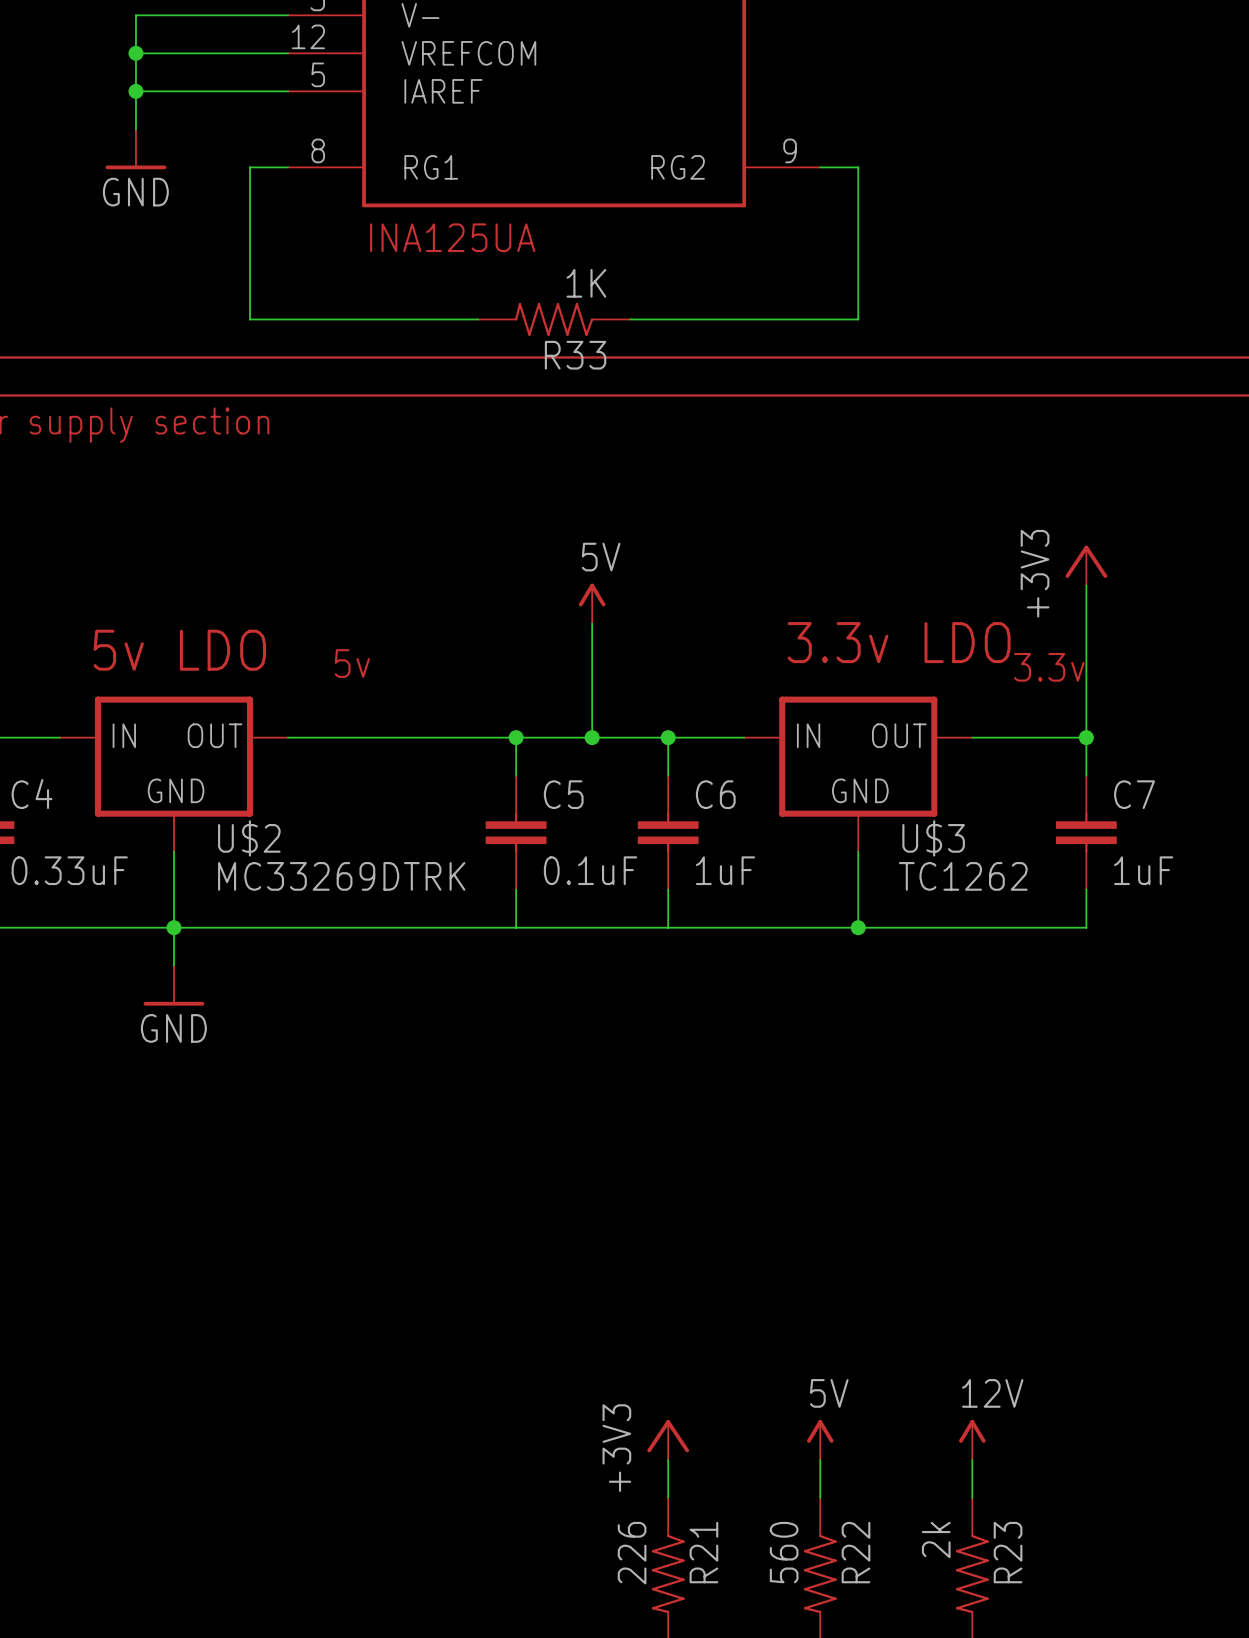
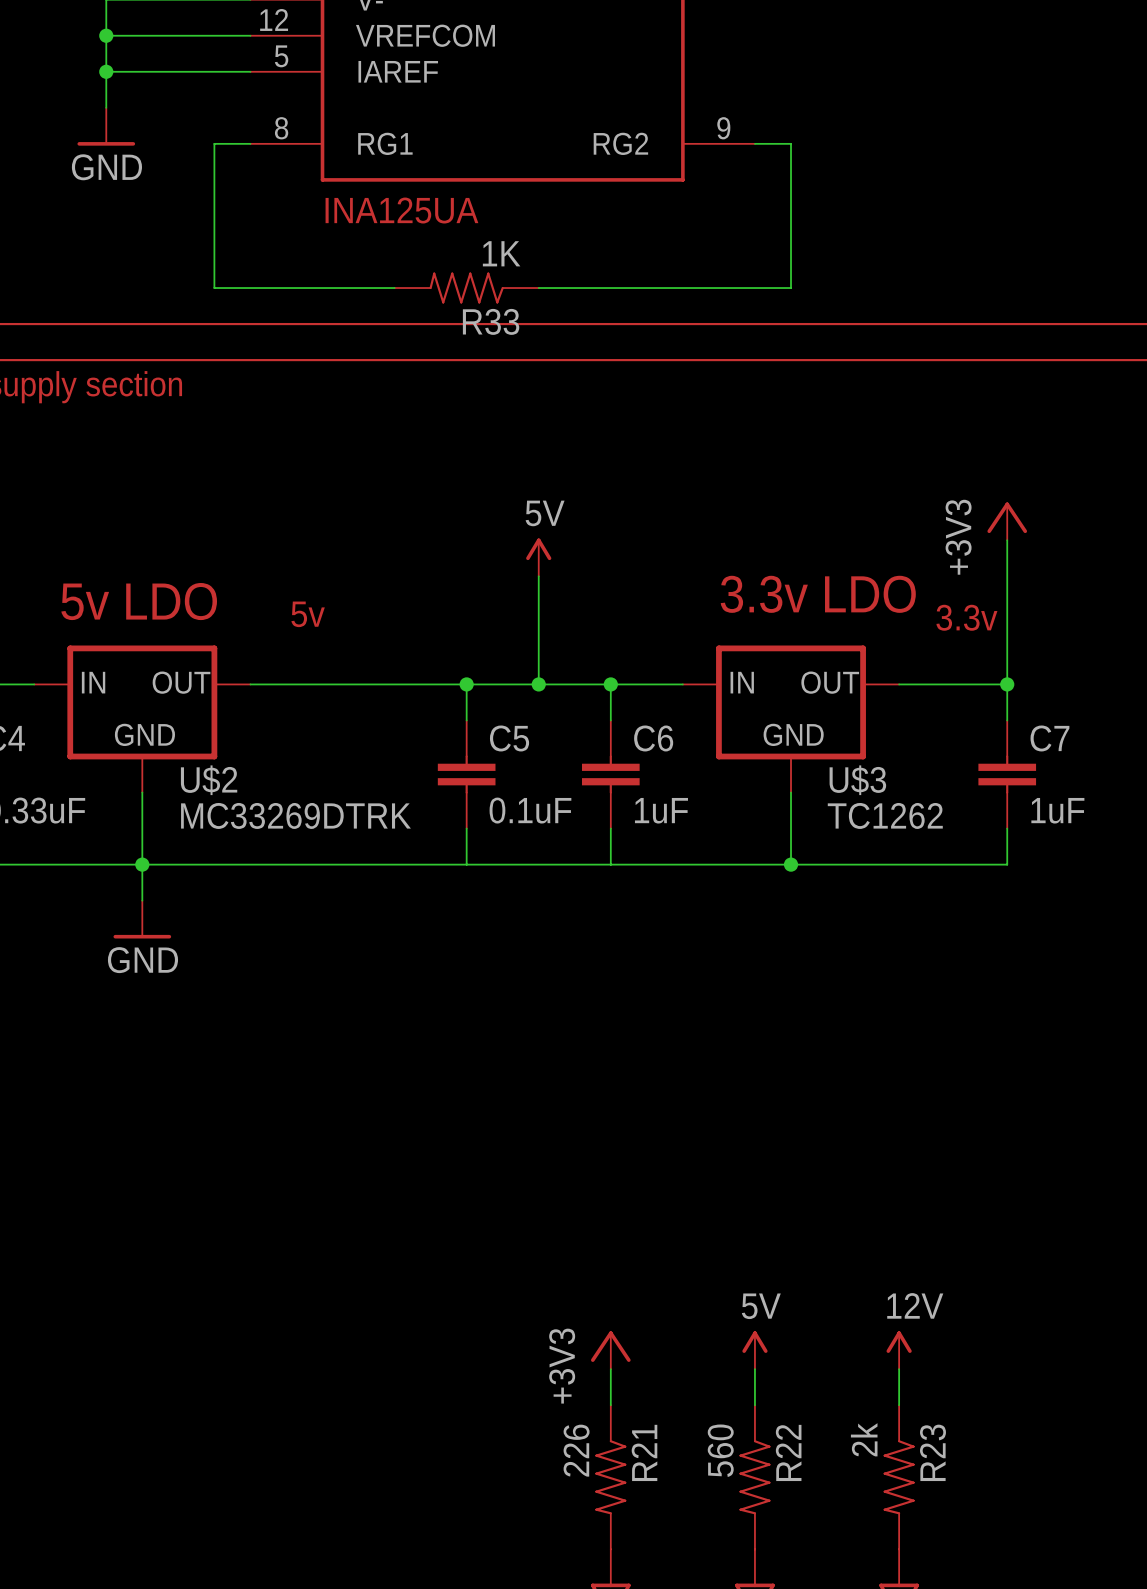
R33 position: (554, 319) -> (466, 288)

